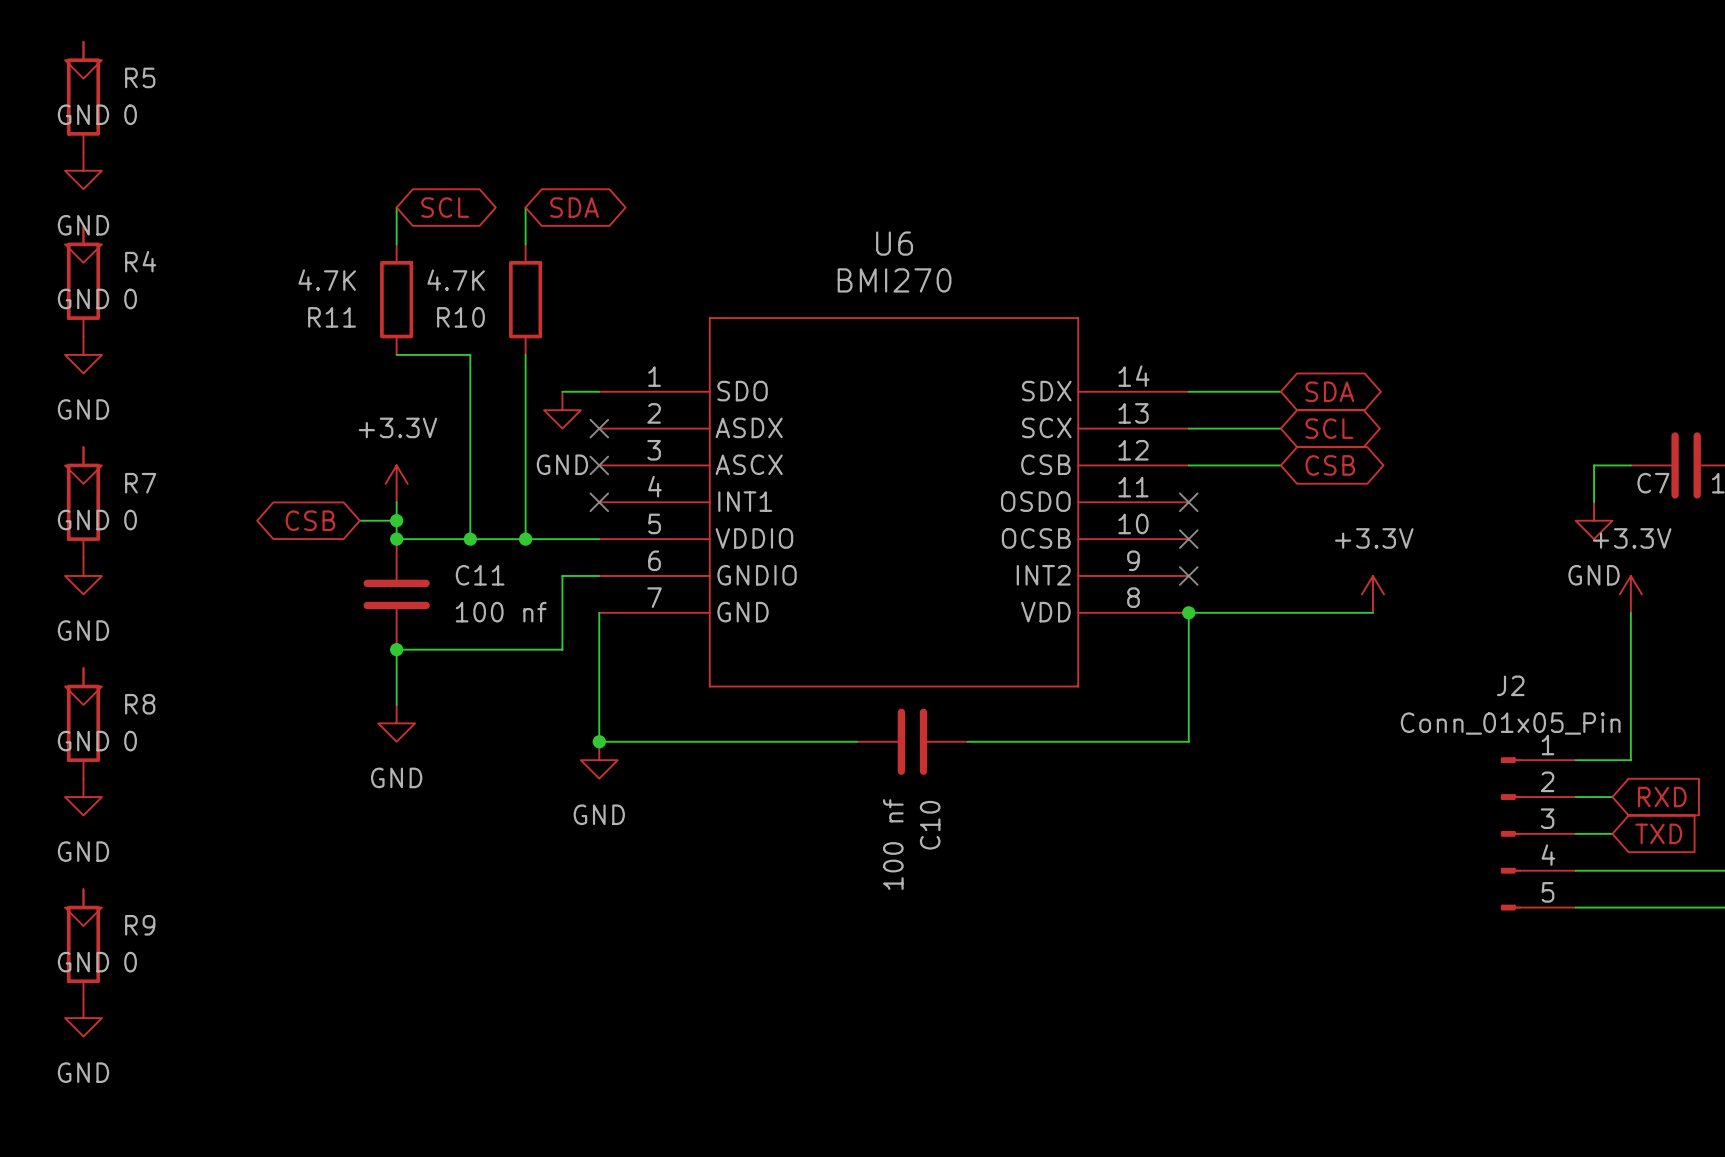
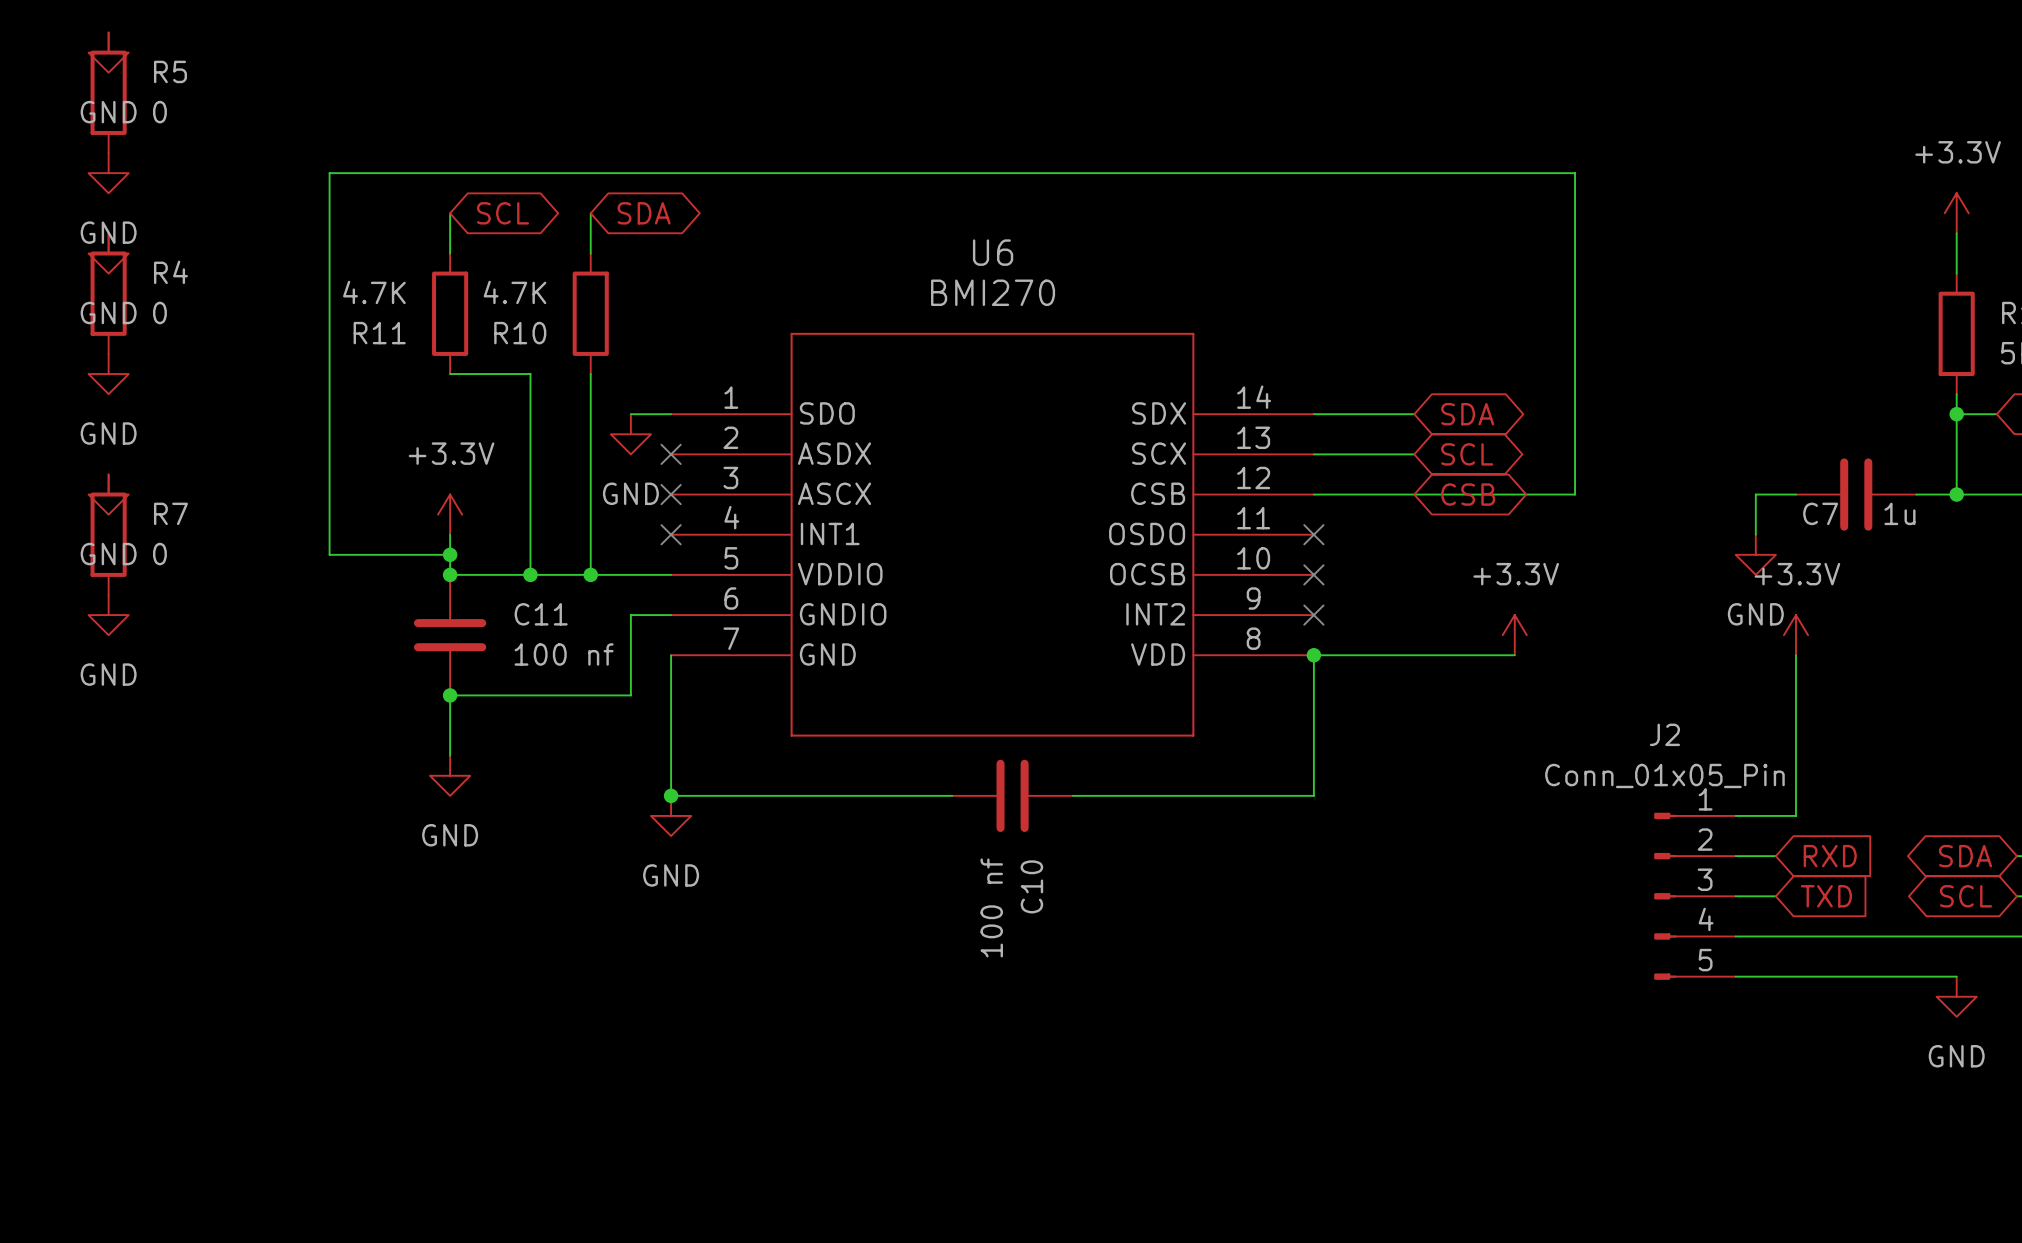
wire: none -> (1414, 494) (1575, 494) (1575, 173) (329, 173) (329, 554) (409, 554)
global label: CSB (310, 520) -> none
power symbol: GND (83, 686) -> none
R8: 0 (83, 723) -> none
power symbol: GND (83, 797) -> none
power symbol: GND (83, 907) -> none
R9: 0 (83, 944) -> none
power symbol: GND (83, 1018) -> none

